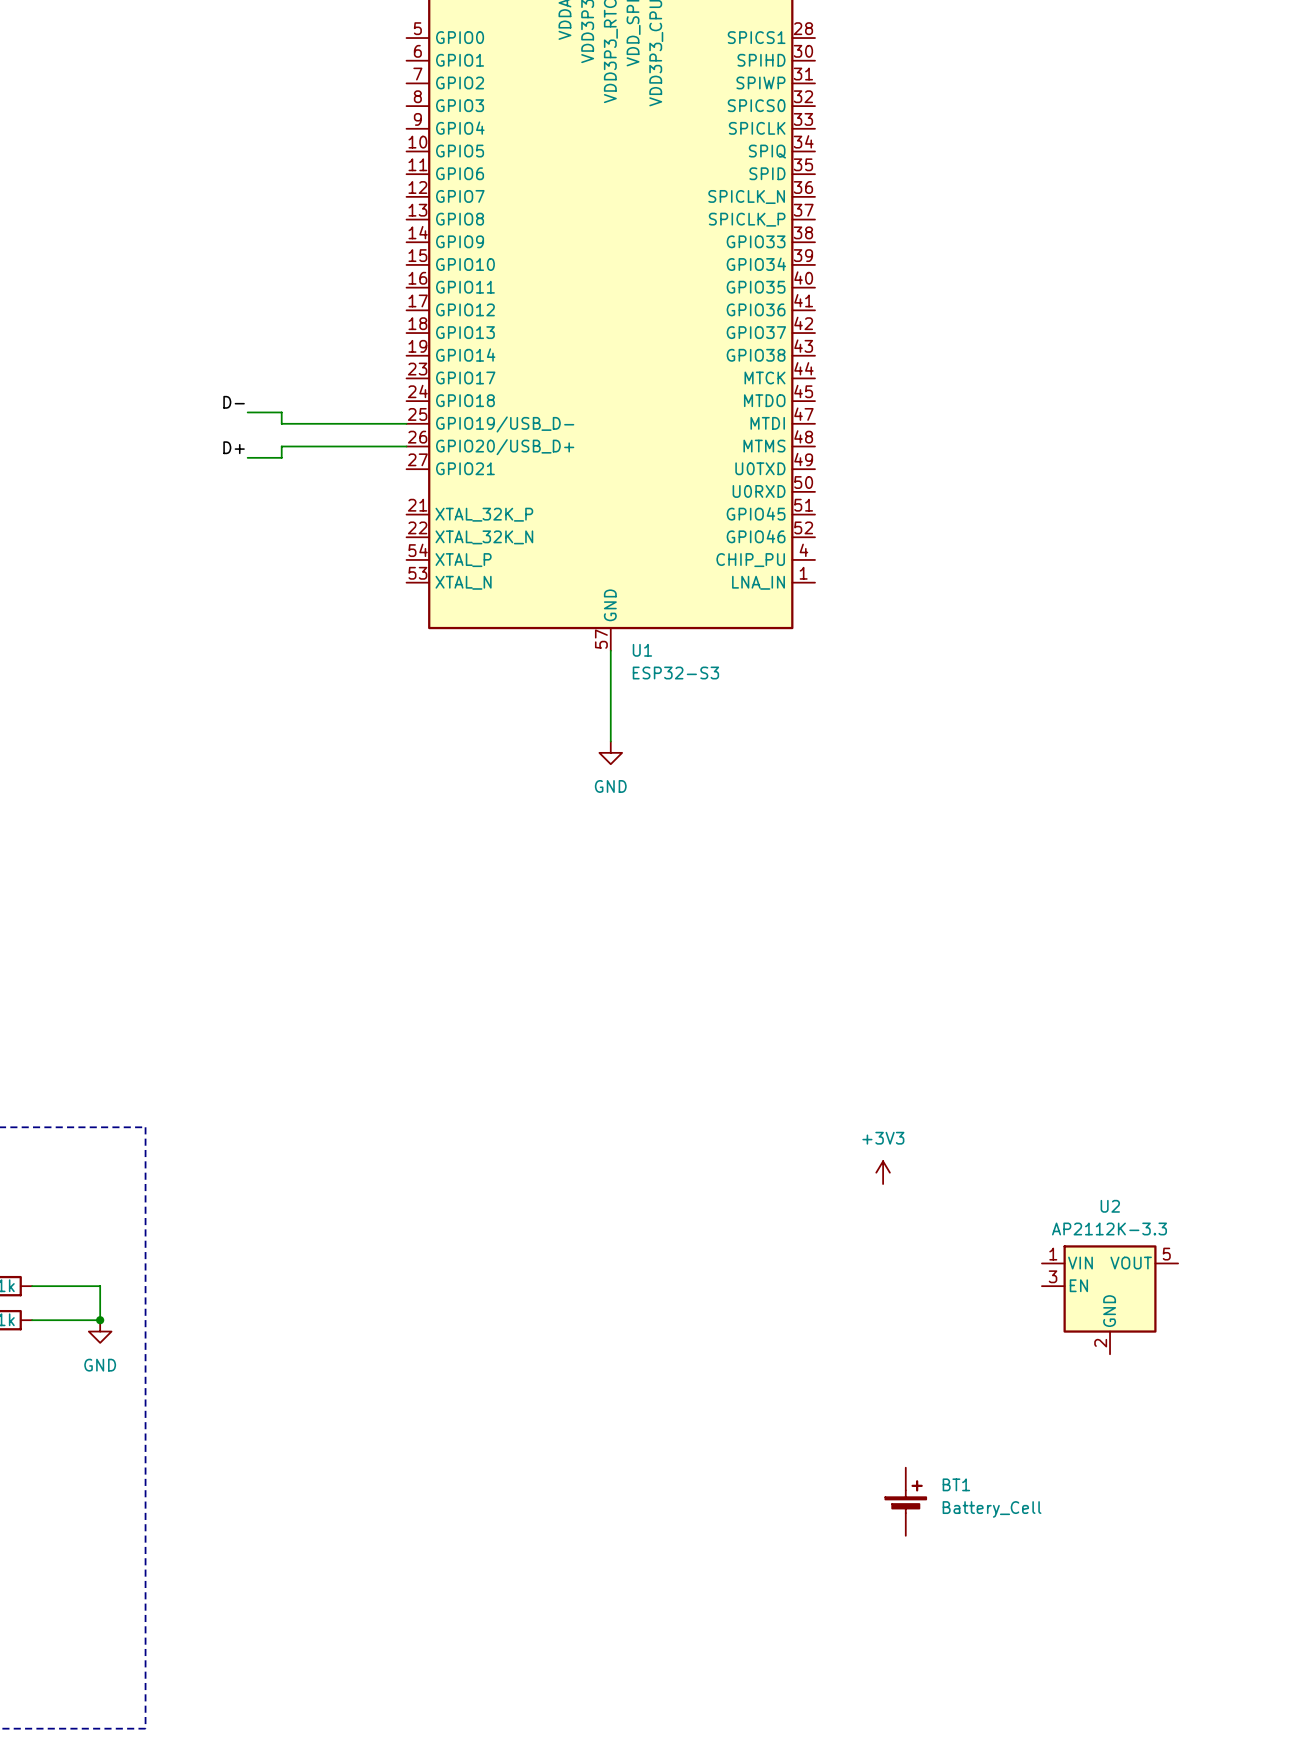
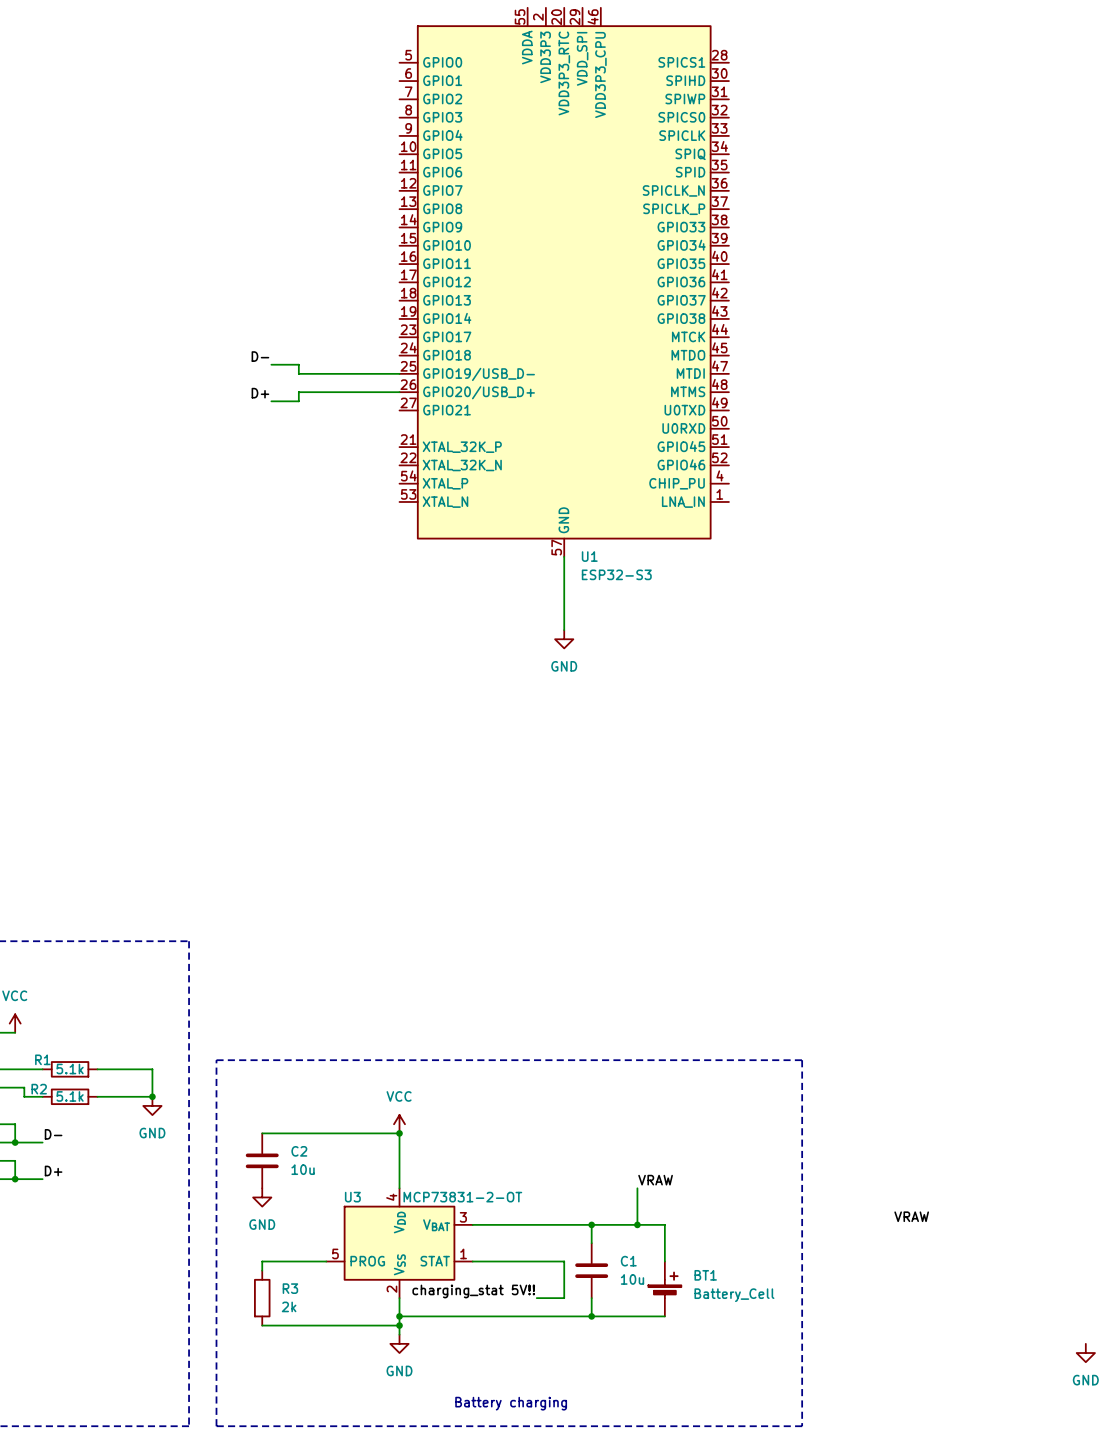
power symbol: +3V3 (883, 1172) -> none
line: none -> (216, 1060) (802, 1060) (802, 1426) (216, 1426) (216, 1060)
U2: AP2112K-3.3 (1110, 1299) -> none
power symbol: none -> VCC (399, 1124)
wire: none -> (262, 1133) (399, 1133) (399, 1188)
junction: none -> (399, 1133)
C2: none -> 10u (262, 1160)
label: none -> VRAW (655, 1180)
wire: none -> (637, 1188) (637, 1224)
power symbol: none -> GND (262, 1197)
label: none -> VRAW (911, 1216)
wire: none -> (472, 1224) (664, 1224) (664, 1261)
wire: none -> (591, 1224) (591, 1243)
junction: none -> (591, 1224)
junction: none -> (637, 1224)
U3: none -> MCP73831-2-OT (399, 1243)
BT1 position: (905, 1501) -> (664, 1288)
wire: none -> (326, 1261) (262, 1261) (262, 1270)
wire: none -> (472, 1261) (564, 1261) (564, 1298) (536, 1298)
C1: none -> 10u (591, 1270)
label: none -> charging_stat 5V!! (473, 1291)
R3: none -> 2k (262, 1298)
wire: none -> (399, 1298) (399, 1334)
wire: none -> (591, 1298) (591, 1316)
wire: none -> (399, 1316) (664, 1316)
junction: none -> (399, 1316)
junction: none -> (591, 1316)
wire: none -> (262, 1325) (399, 1325)
junction: none -> (399, 1325)
power symbol: none -> GND (399, 1343)
power symbol: none -> GND (1085, 1353)
text: none -> Battery charging (511, 1403)

